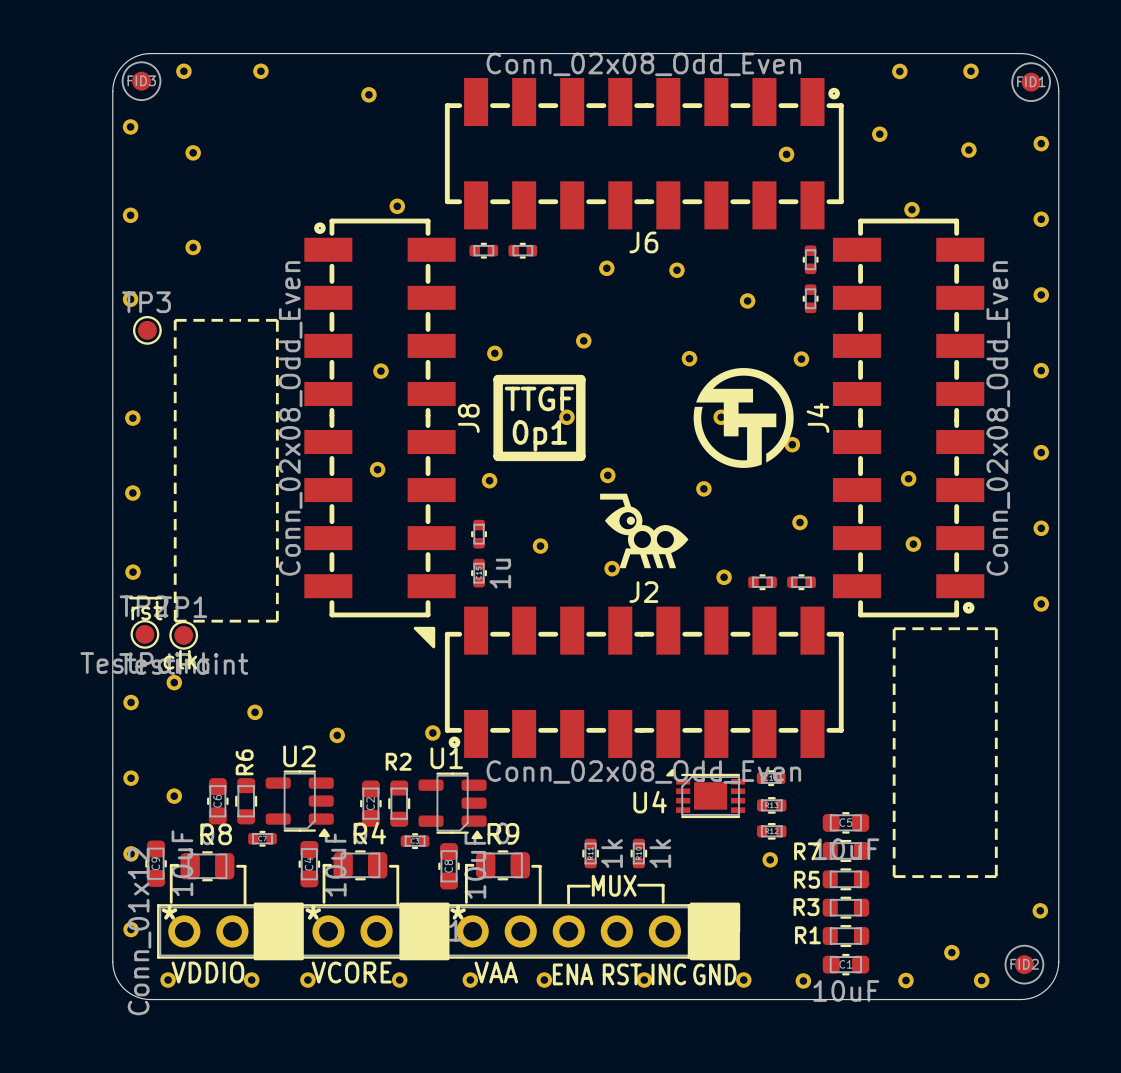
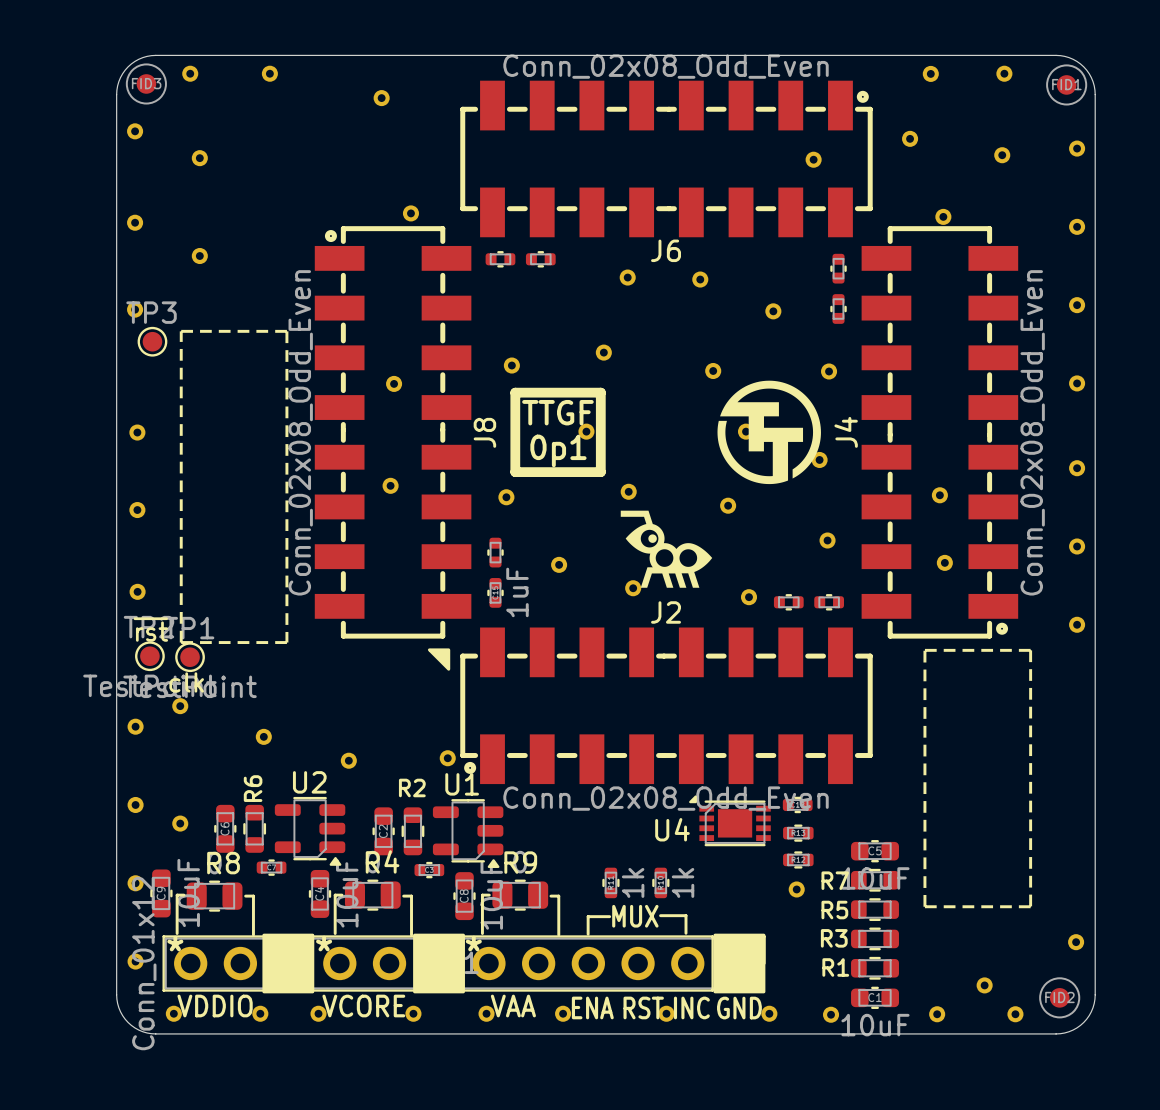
part value: 1u (500, 573) -> 1uF (517, 592)

